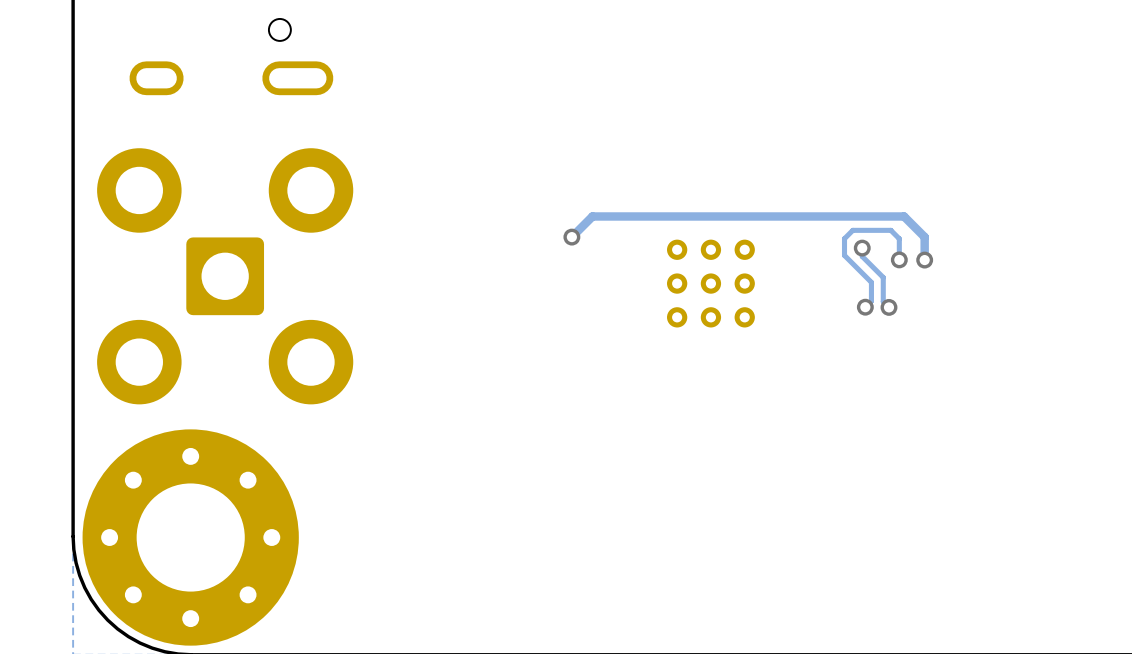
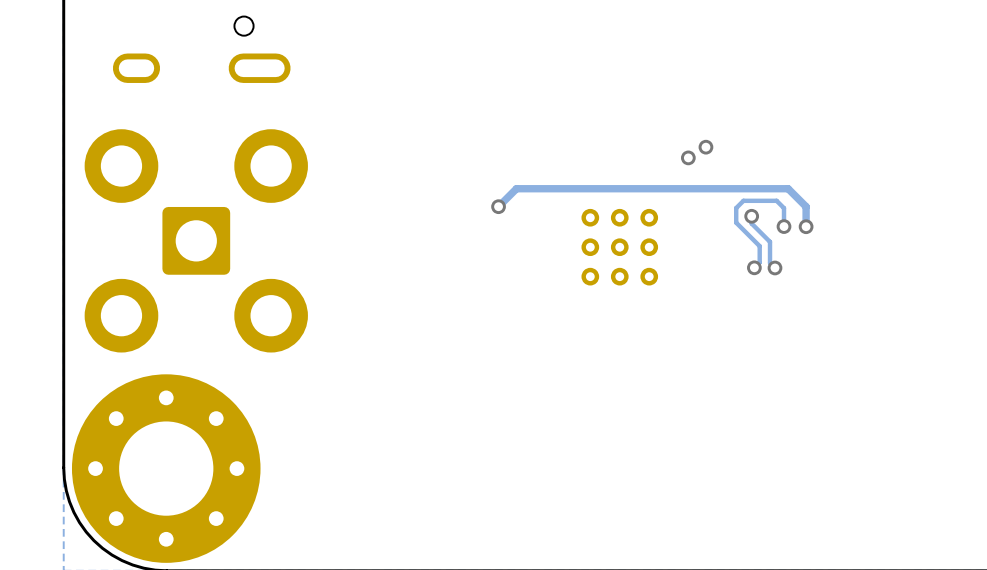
via: none -> (705, 147)
via: none -> (688, 157)

